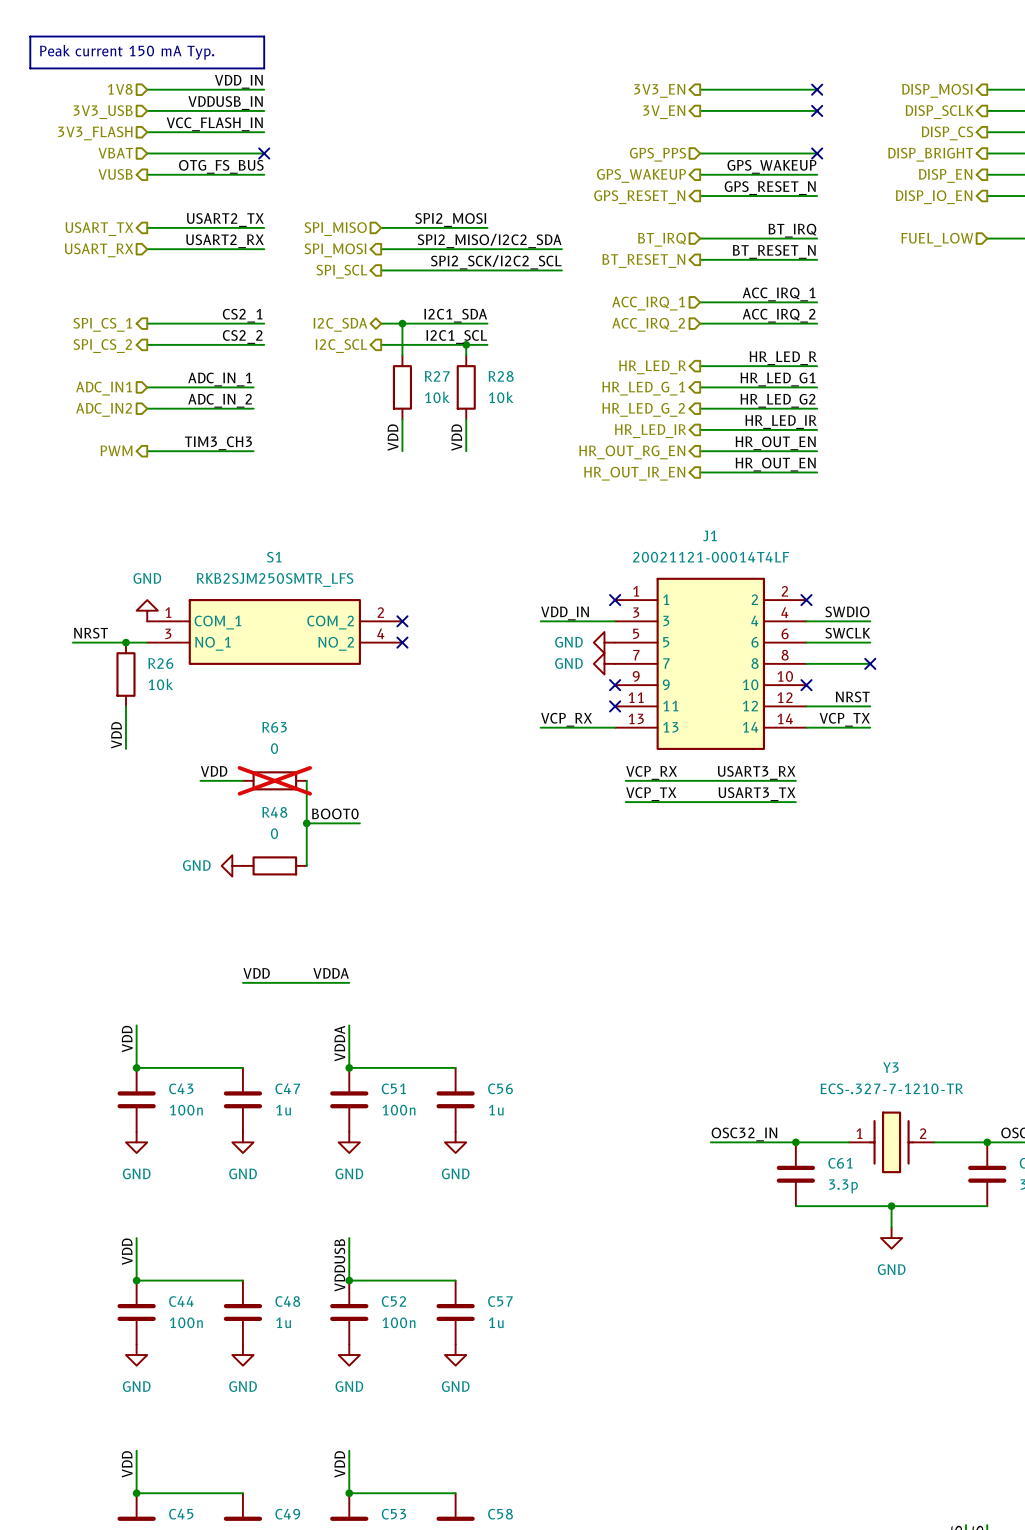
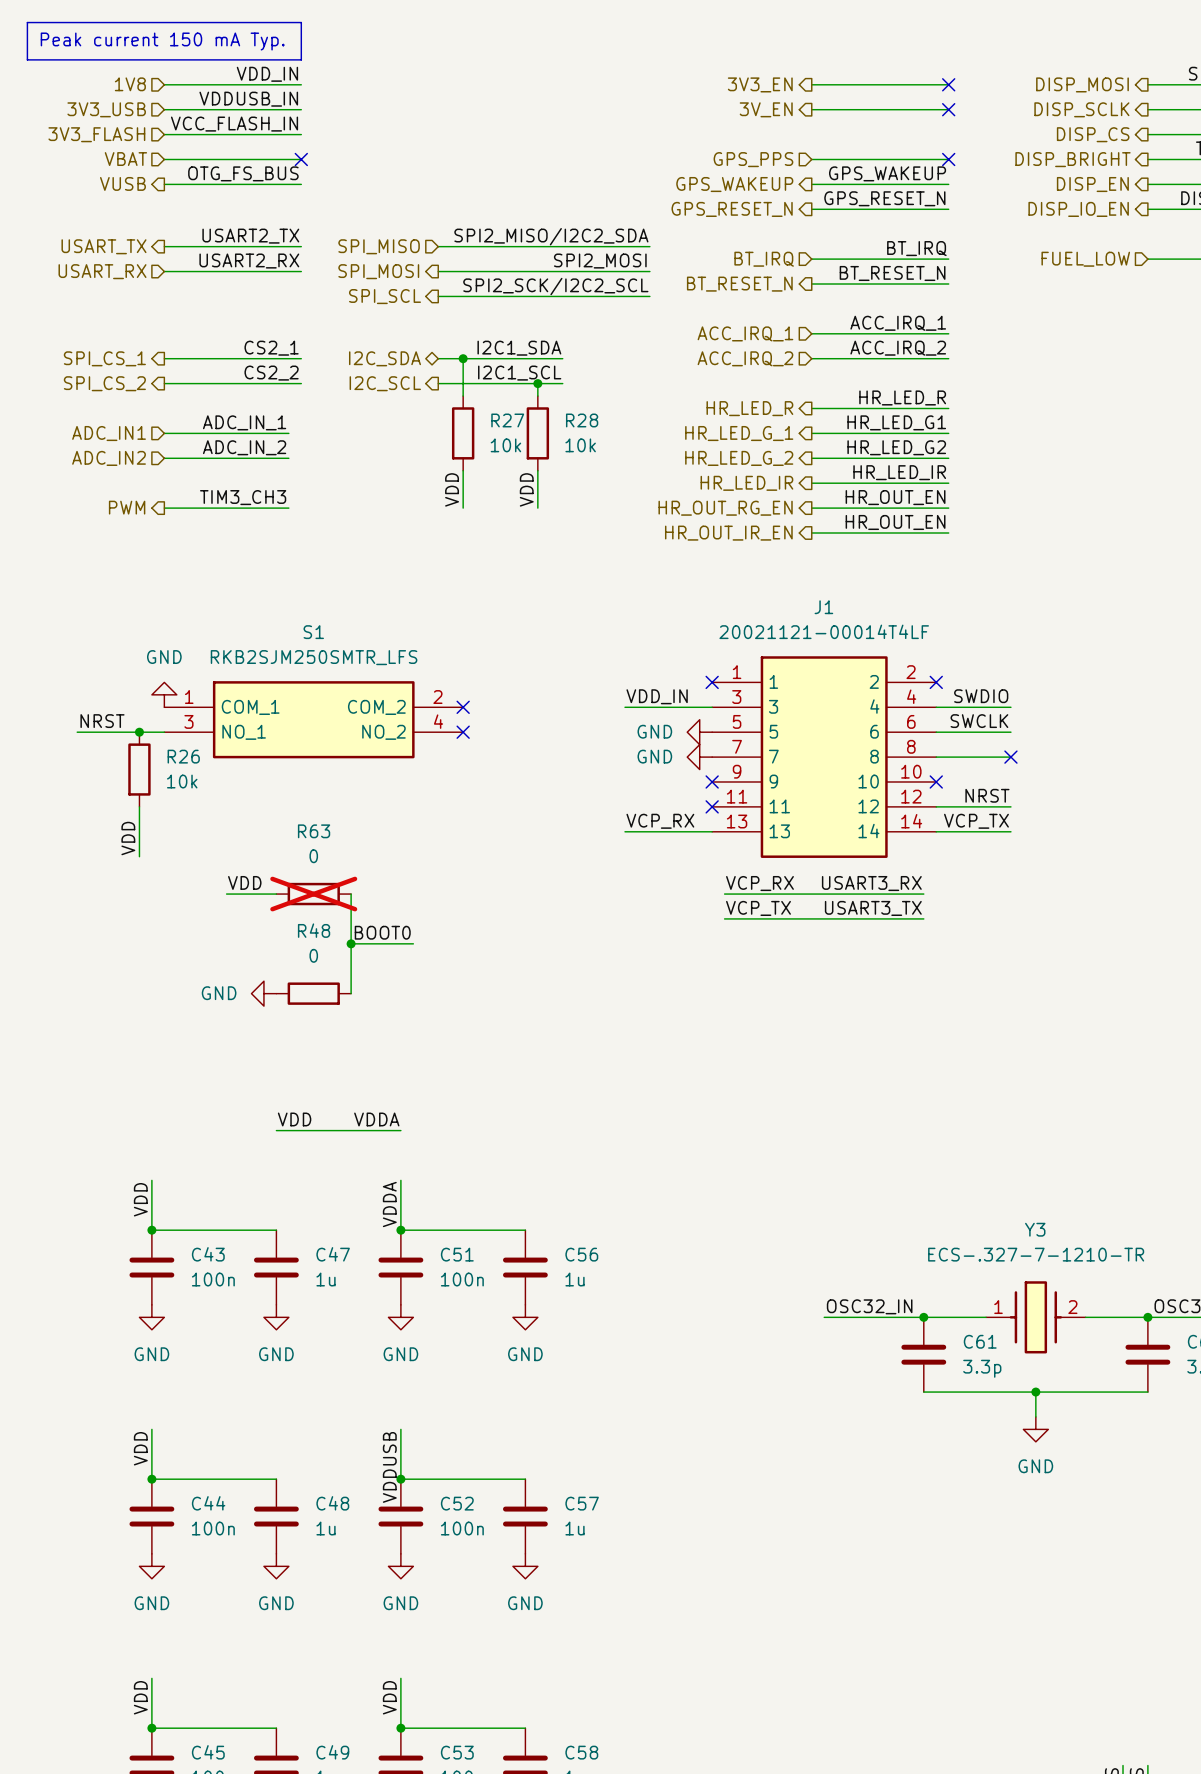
label: none -> SPI2_MISO/I2C2_SDA (551, 236)
label: SPI2_MOSI (450, 220) -> none
wire: none -> (562, 246) (649, 246)
label: SPI2_MISO/I2C2_SDA (489, 241) -> SPI2_MOSI (600, 261)

